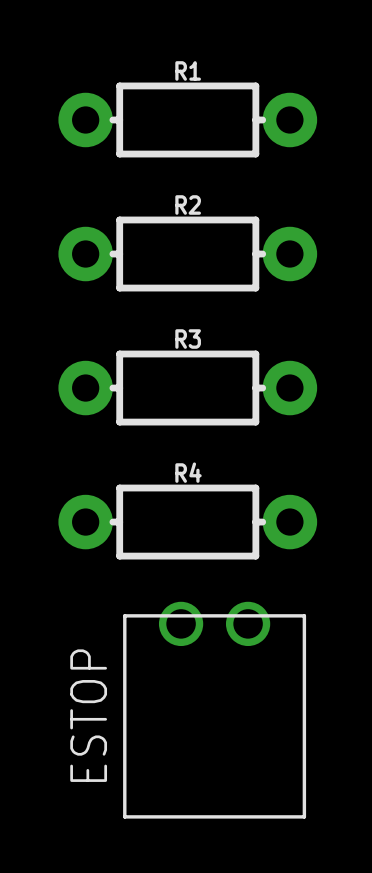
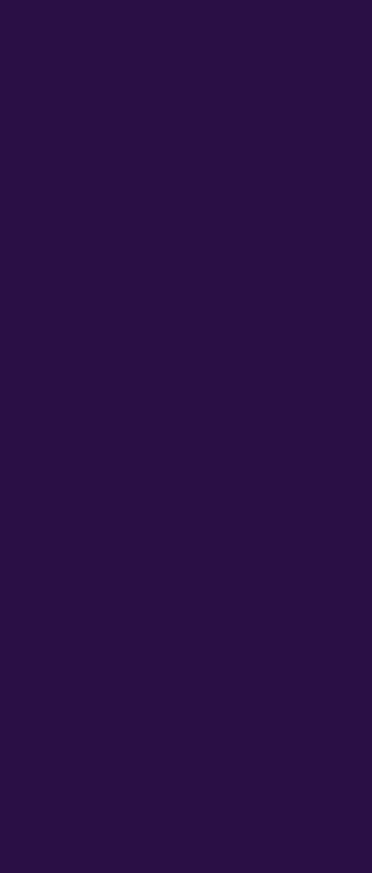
R1: (187, 119) -> none
R2: (187, 254) -> none
R3: (187, 388) -> none
R4: (187, 522) -> none
ESTOP: (214, 710) -> none

